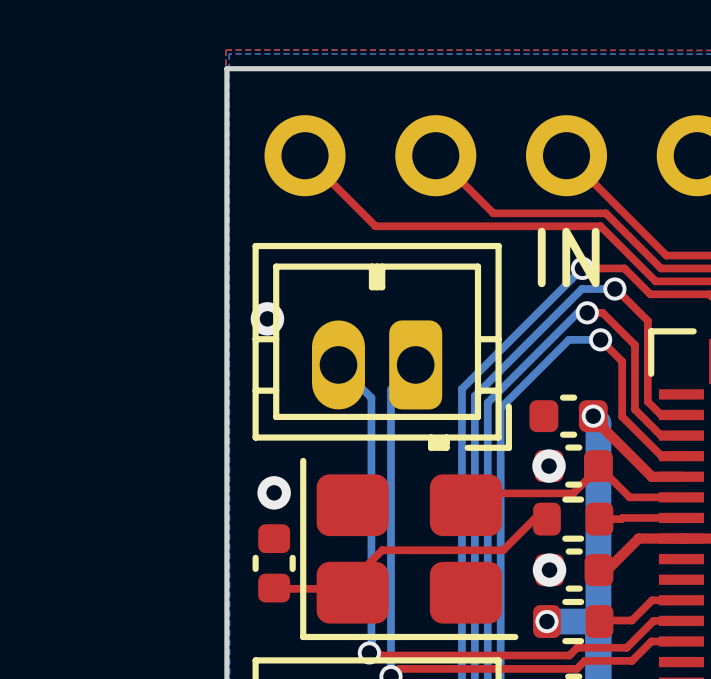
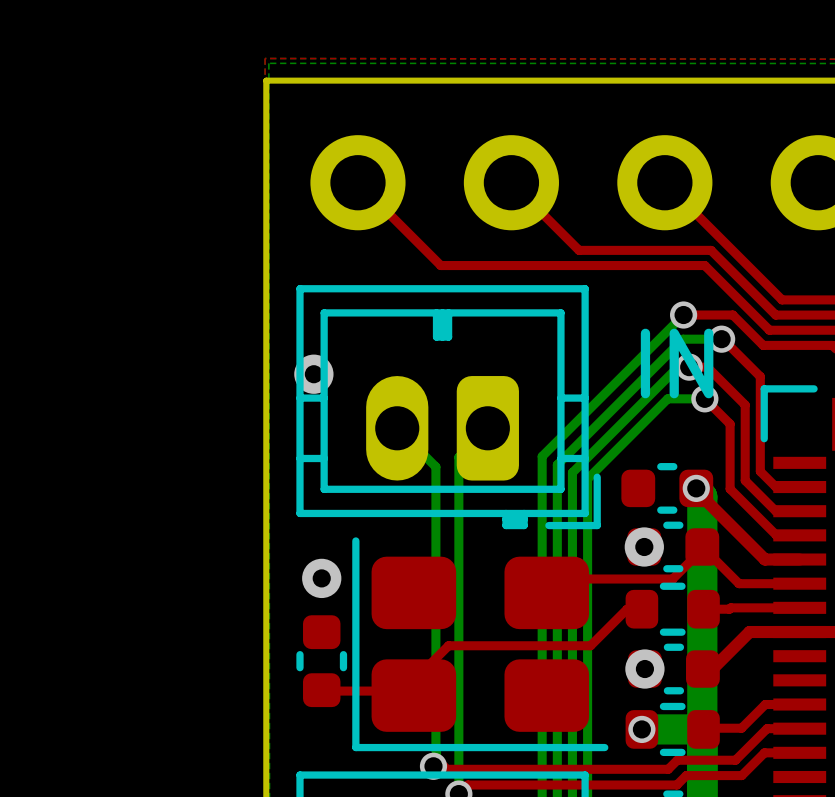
text position: IN (568, 257) -> IN (677, 363)

